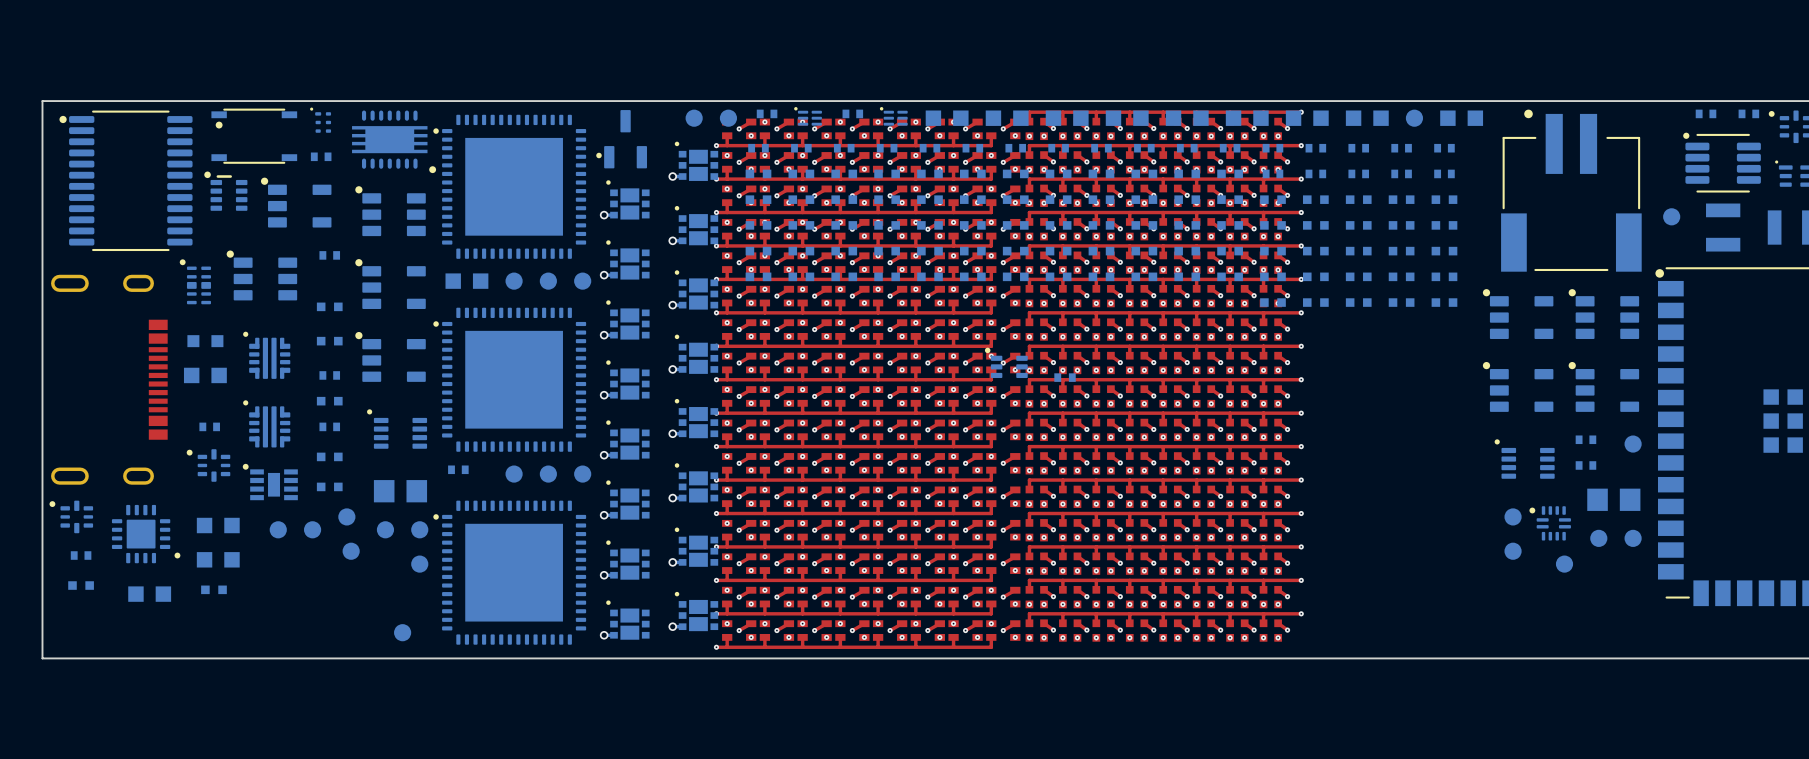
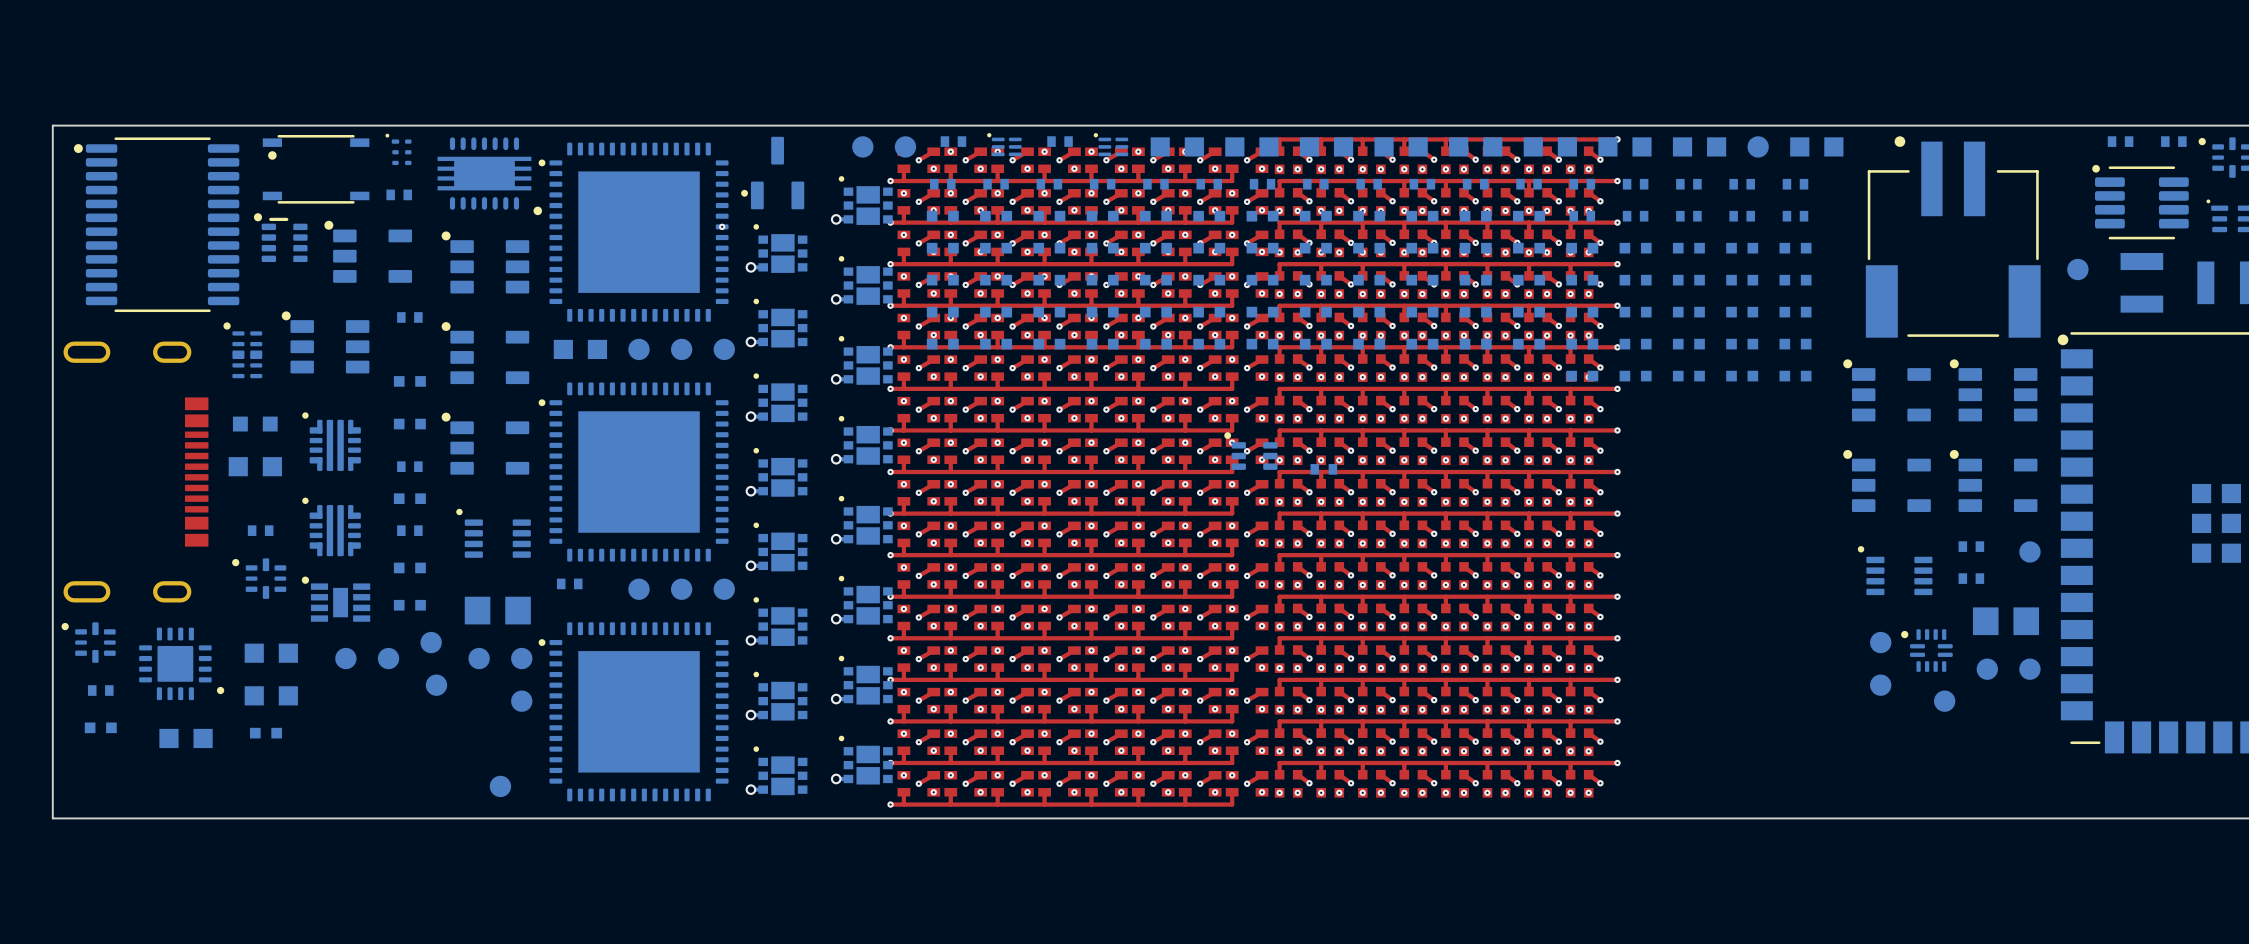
via: none -> (722, 226)

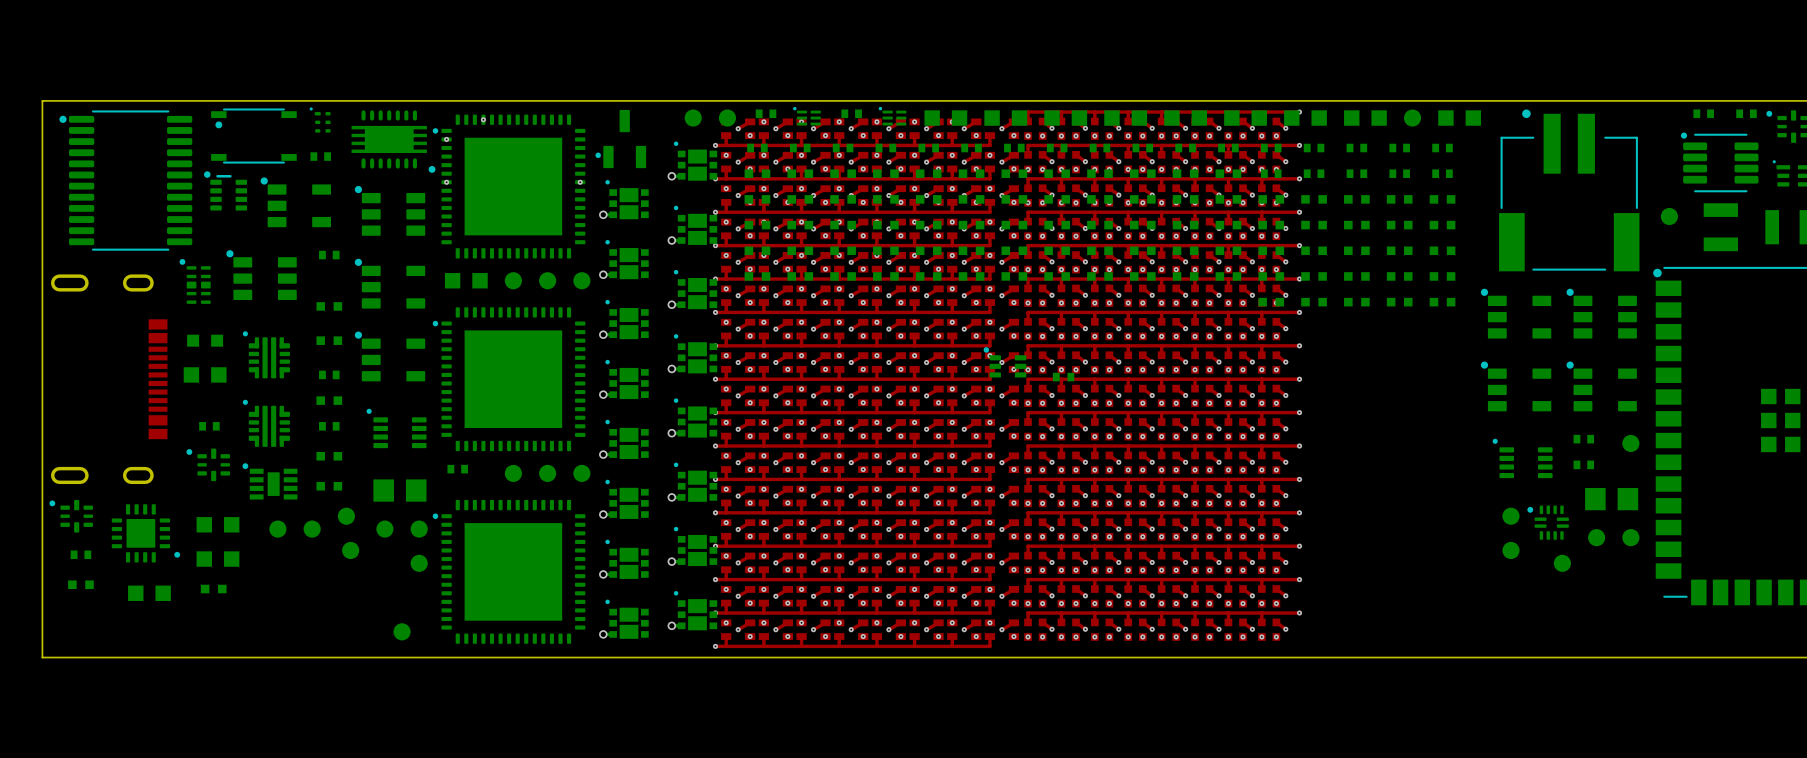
via: none -> (483, 119)
via: none -> (446, 139)
via: none -> (446, 182)

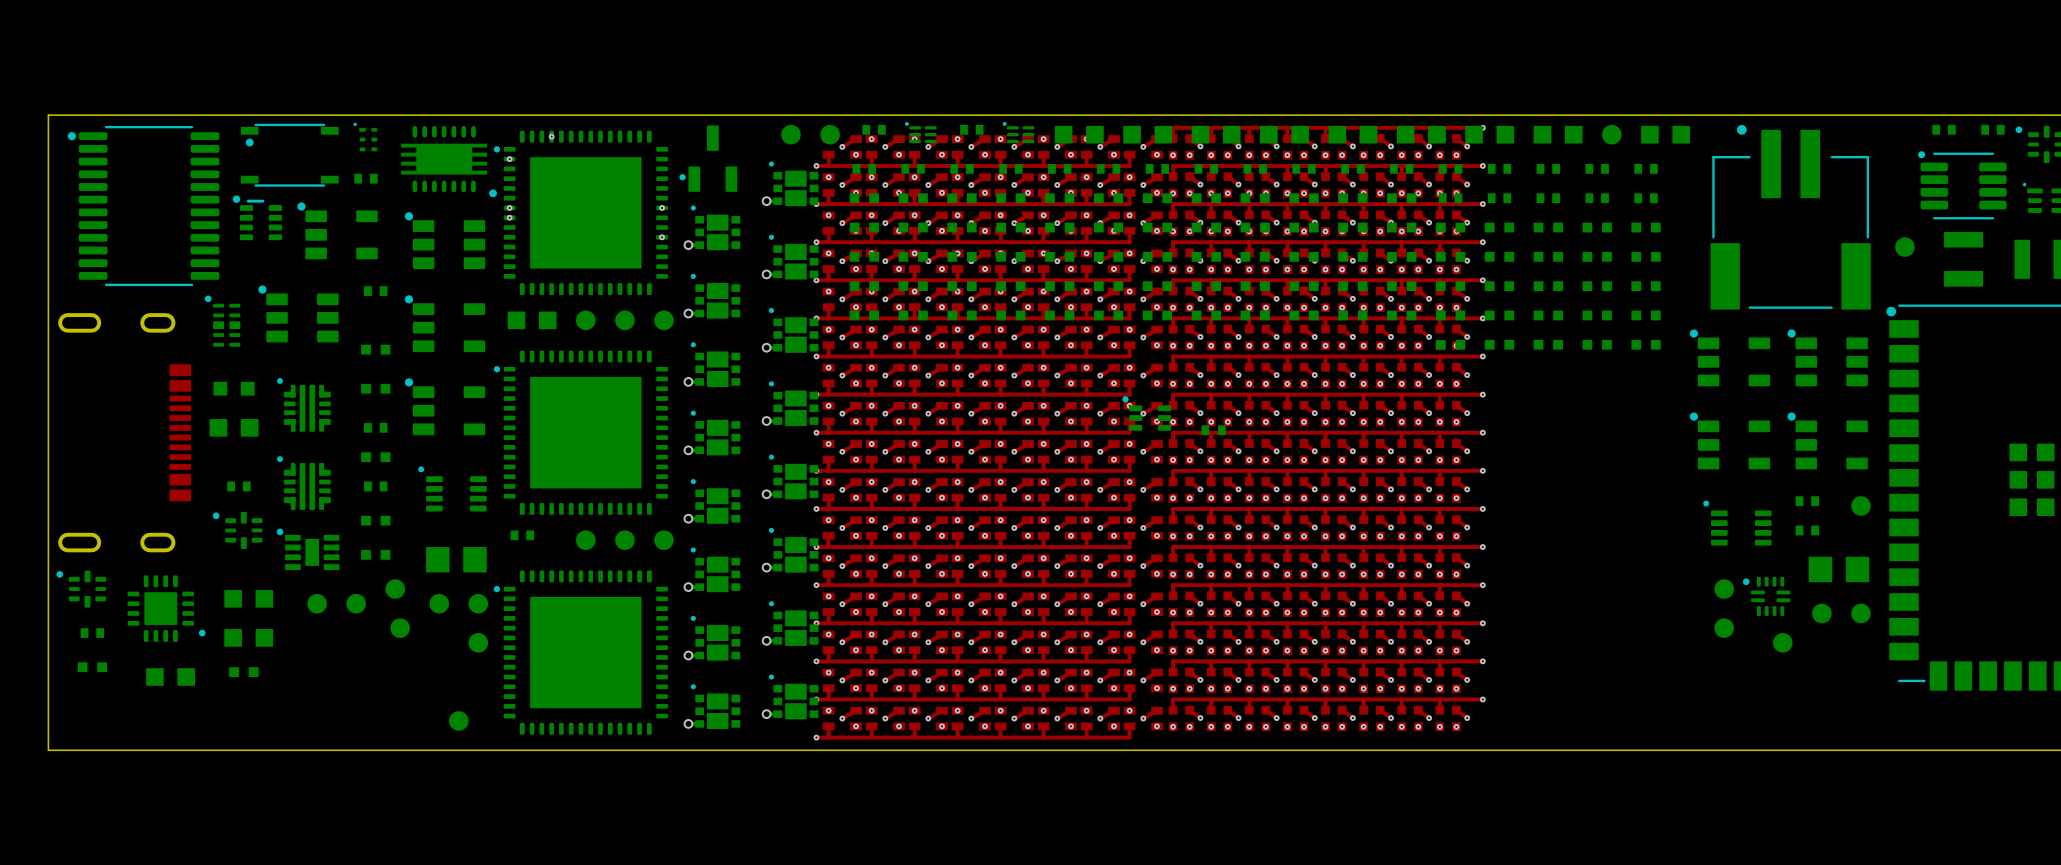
via: none -> (509, 217)
via: none -> (662, 237)

